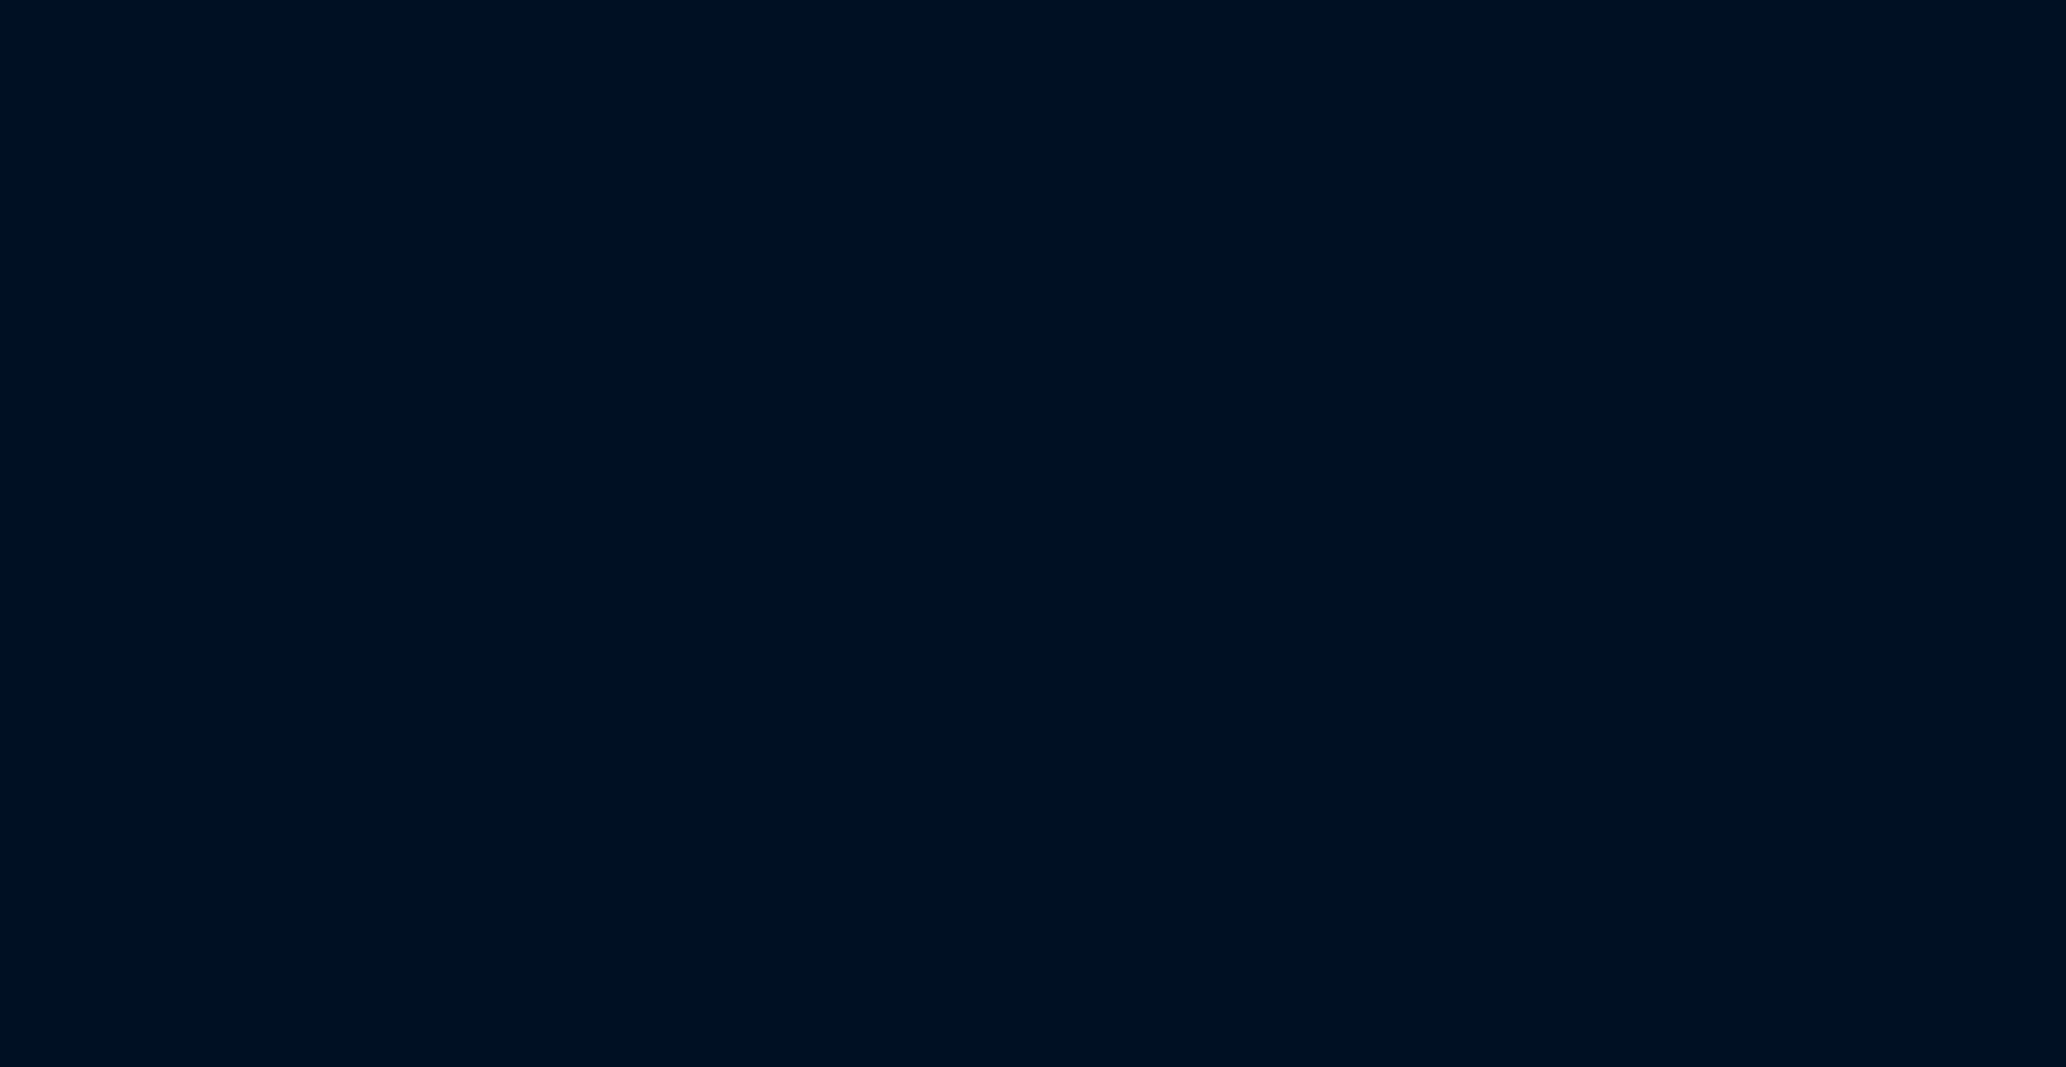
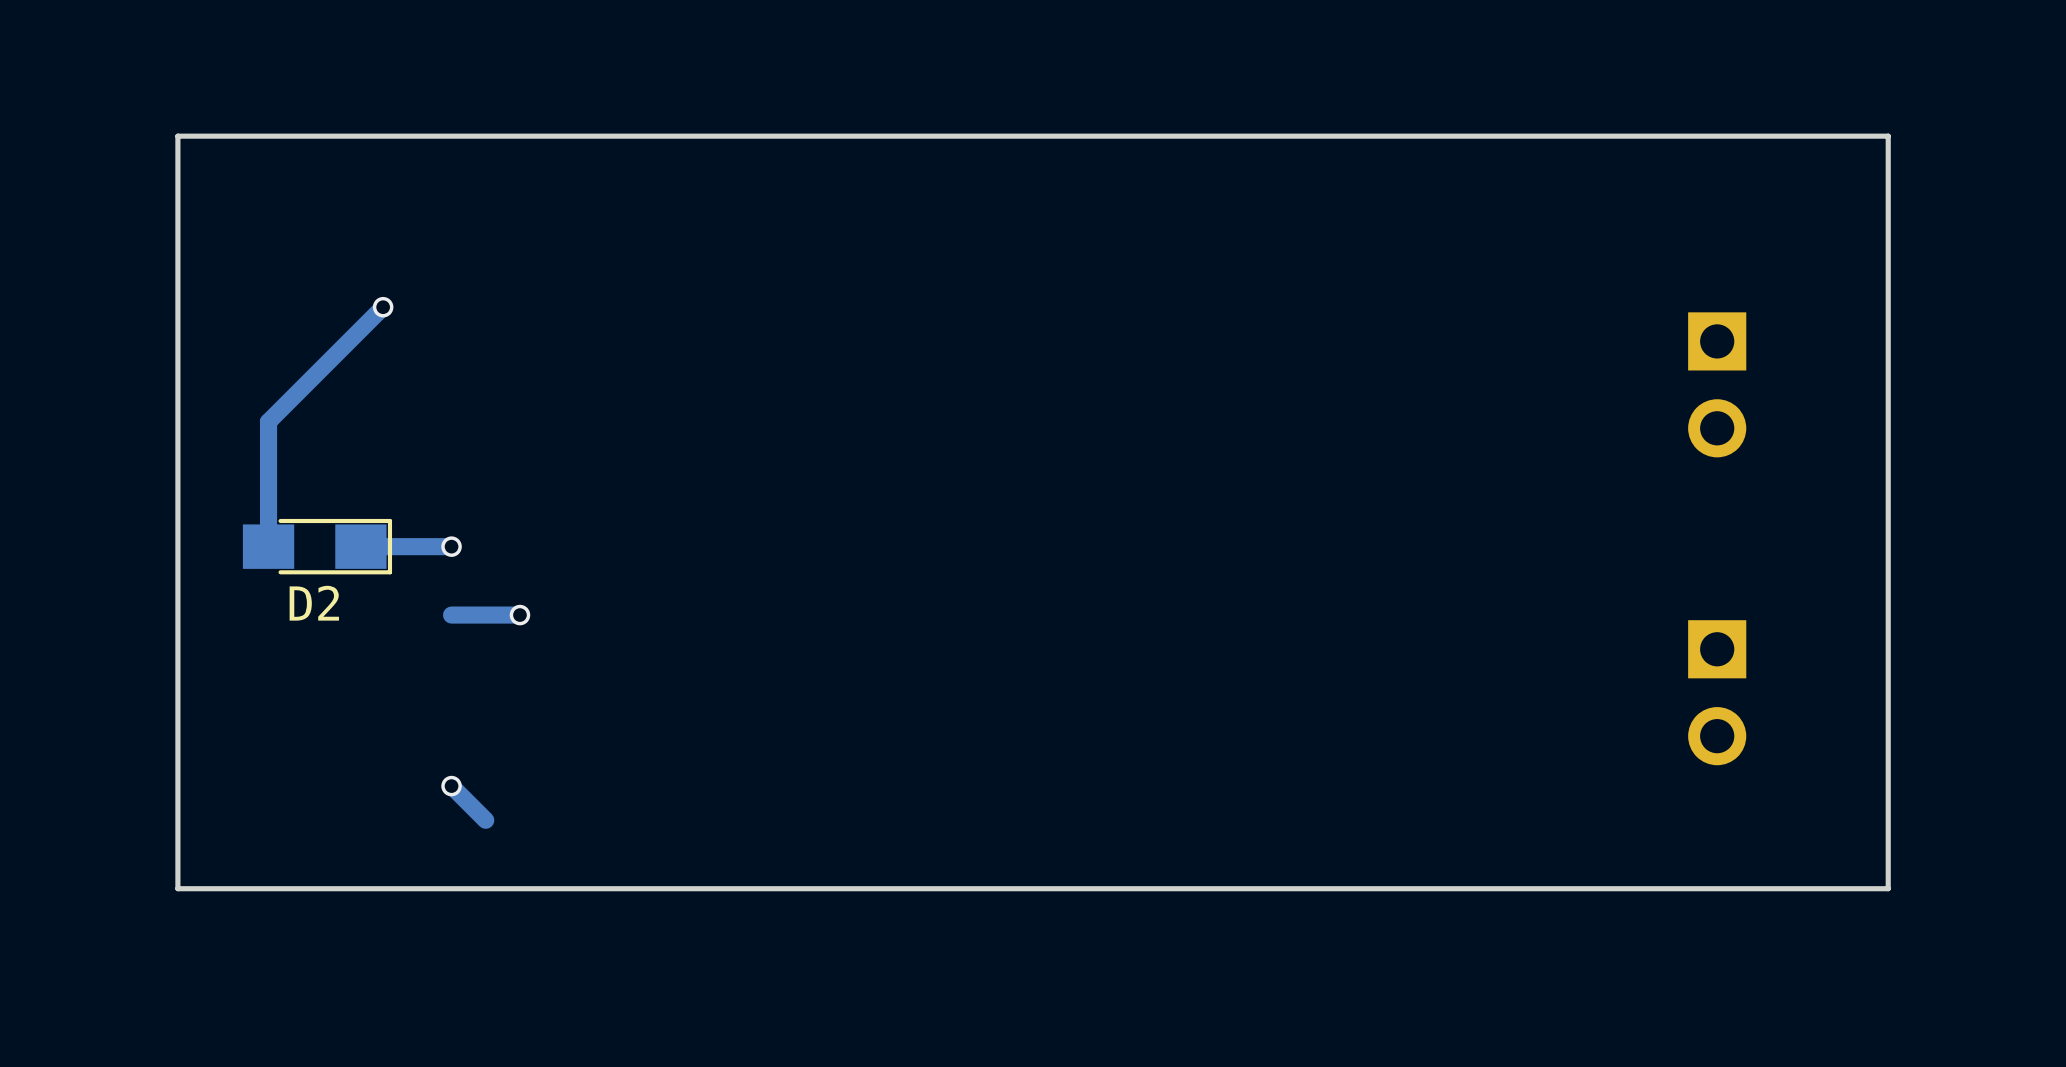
board edge: none -> (1888, 136) (1888, 888) (177, 888) (177, 136) (1888, 136)
track: none -> (383, 307) (268, 421) (268, 546)
via: none -> (383, 307)
part: none -> (1717, 384)
D2: none -> (317, 546)
track: none -> (451, 546) (360, 546)
via: none -> (451, 546)
track: none -> (519, 615) (451, 615)
via: none -> (519, 615)
part: none -> (1717, 692)
track: none -> (451, 786) (485, 820)
via: none -> (451, 786)

